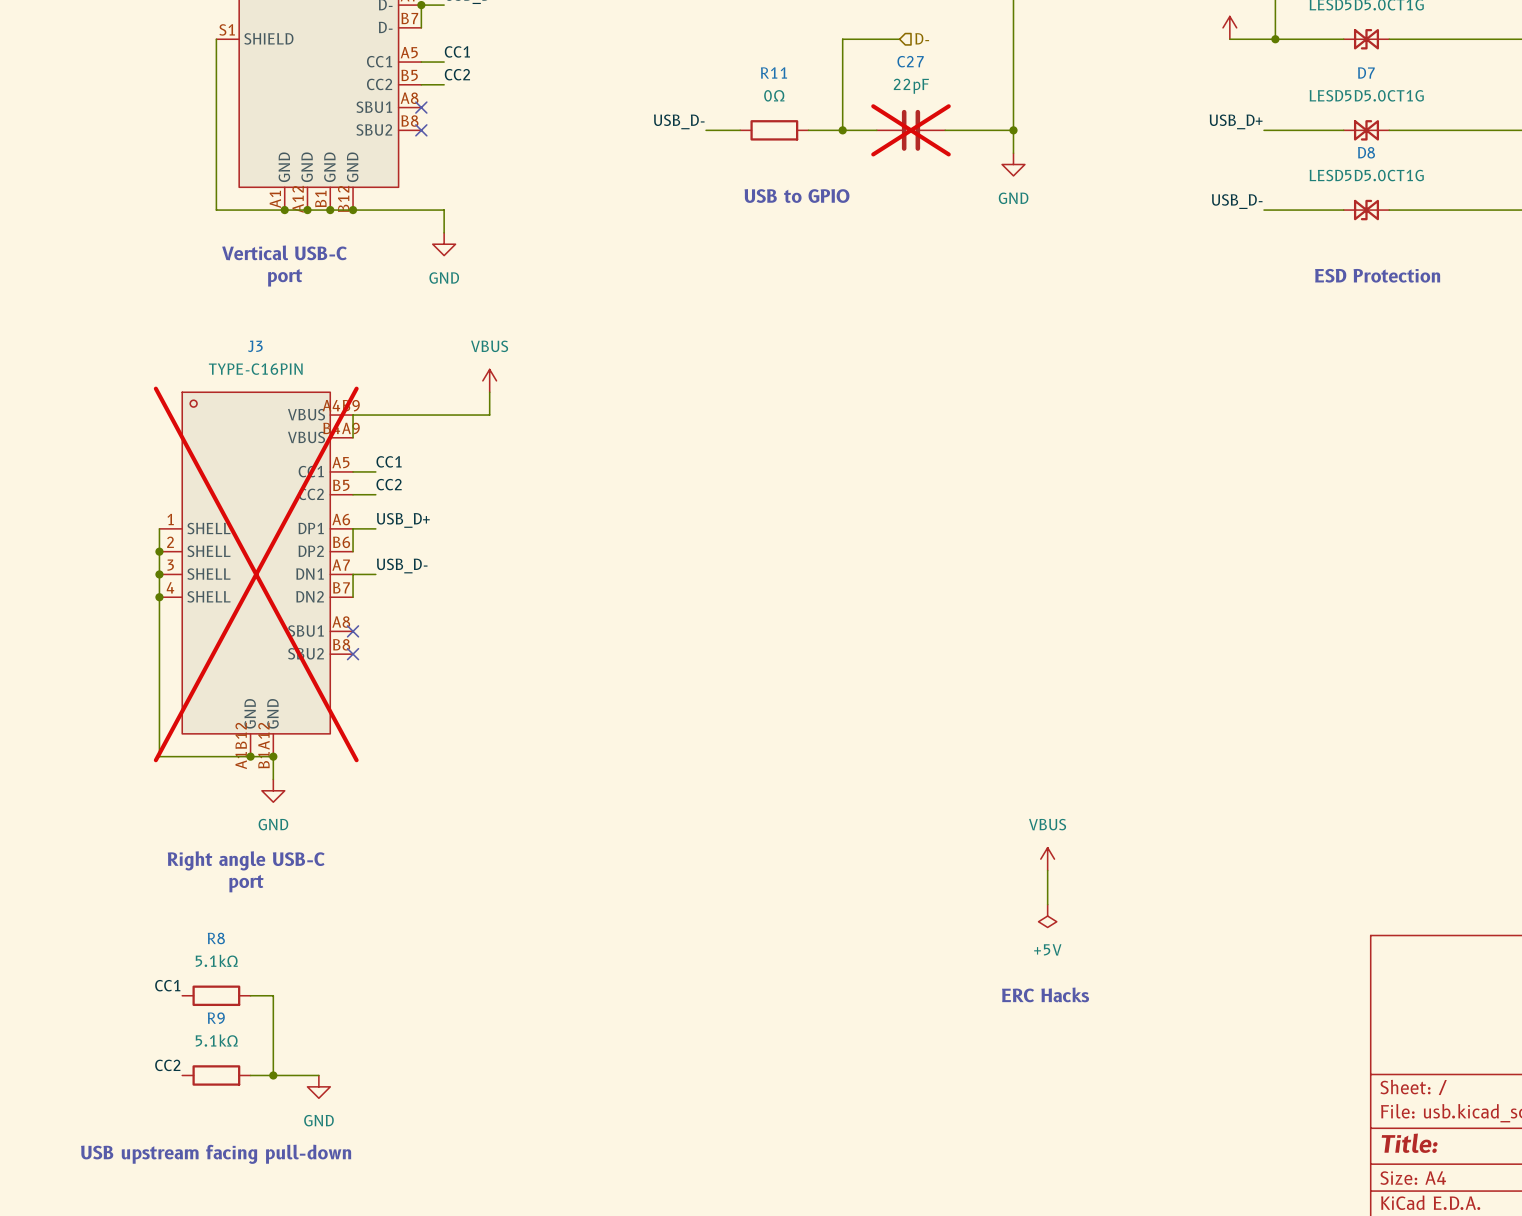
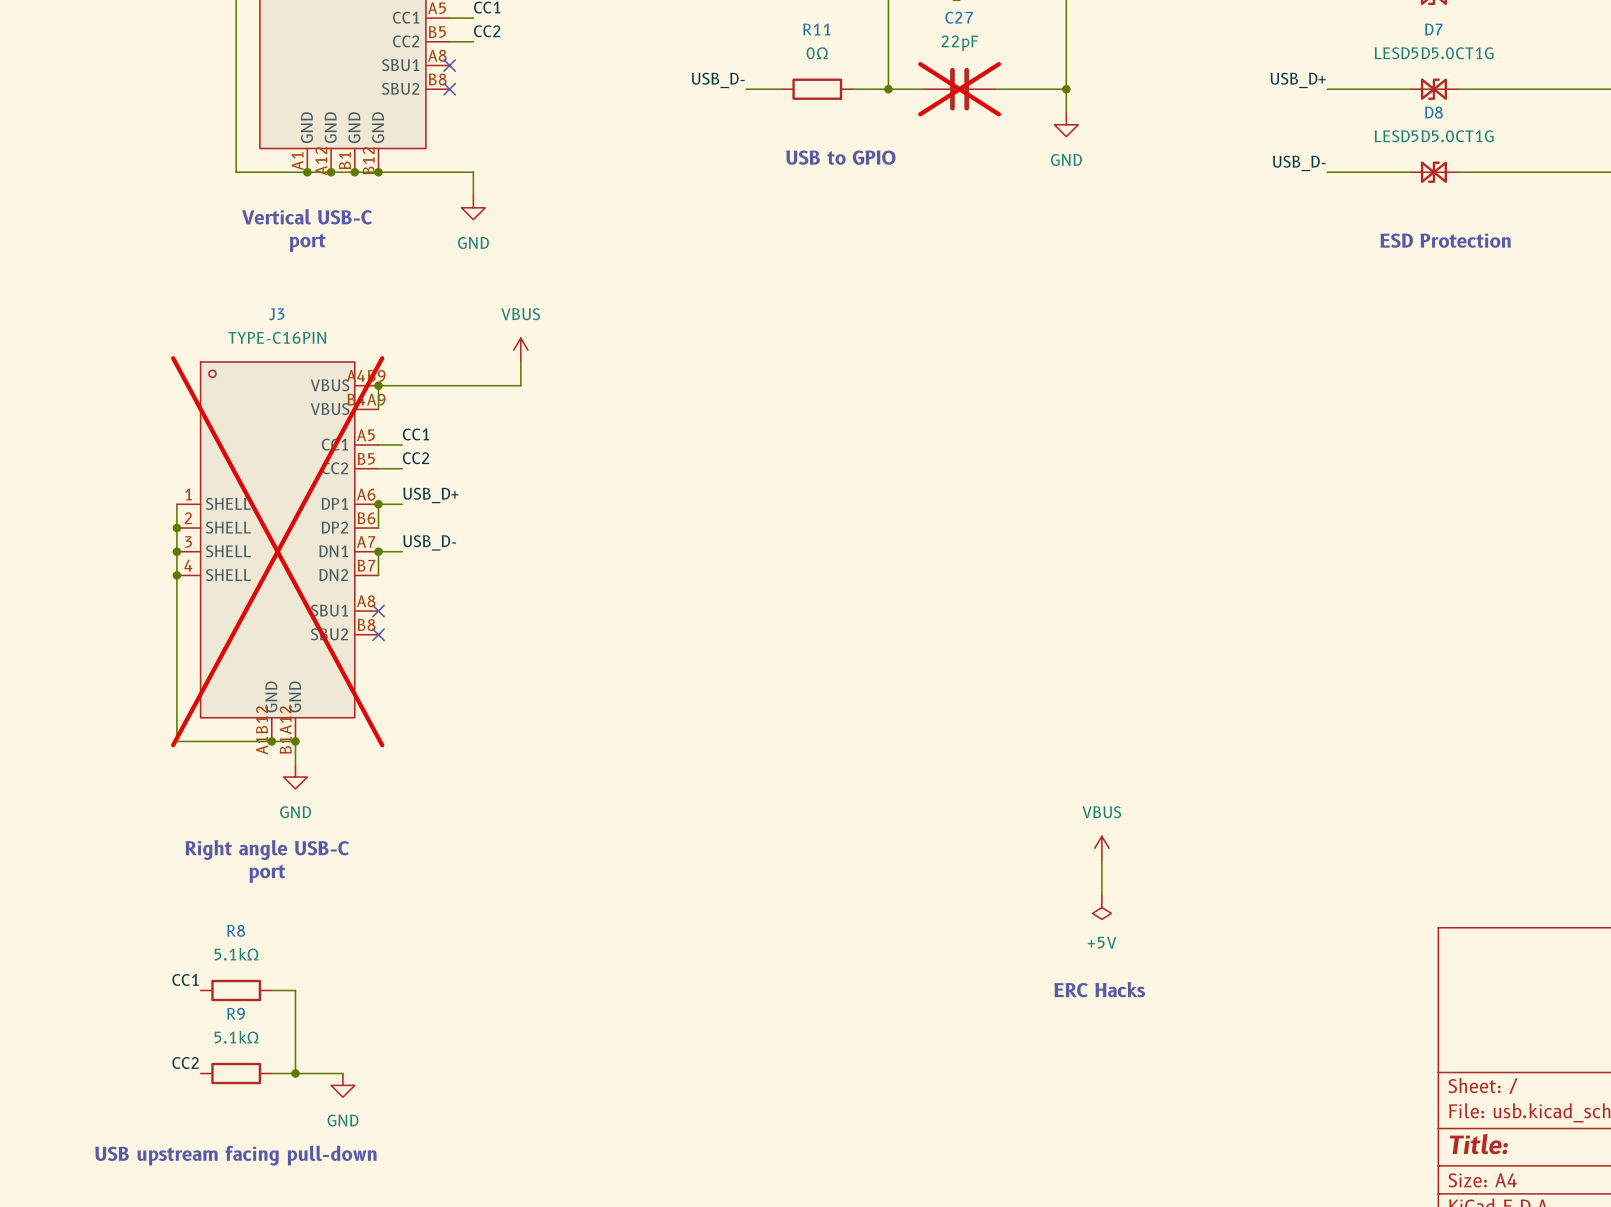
junction: none -> (378, 385)
junction: none -> (378, 504)
junction: none -> (378, 551)

